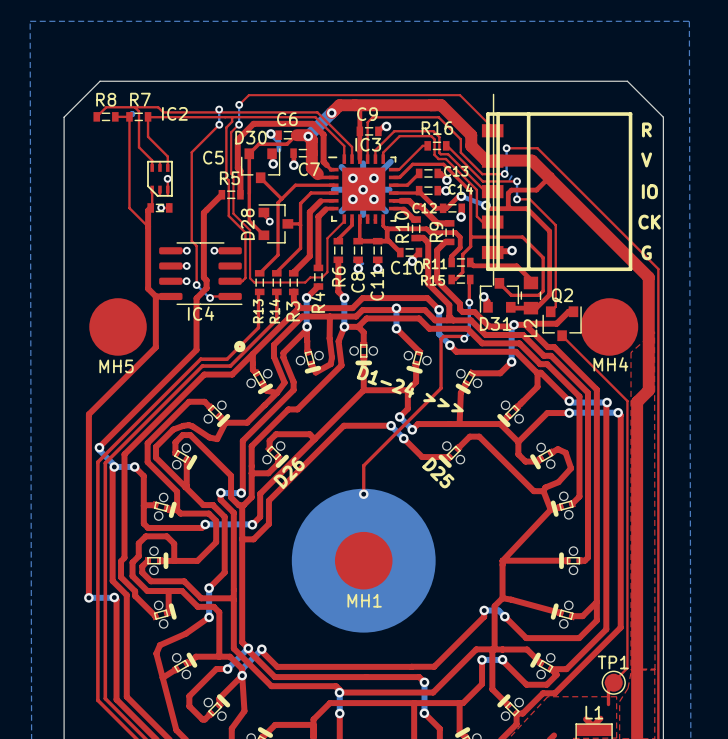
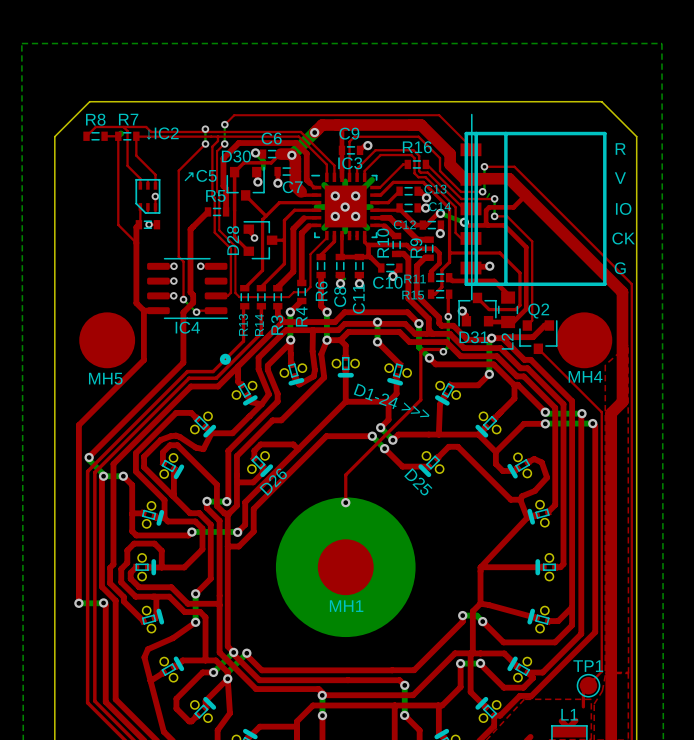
IC2 name: IC2 (174, 113) -> ↓IC2 (162, 133)
C5 name: C5 (213, 157) -> ↗C5 (200, 175)

